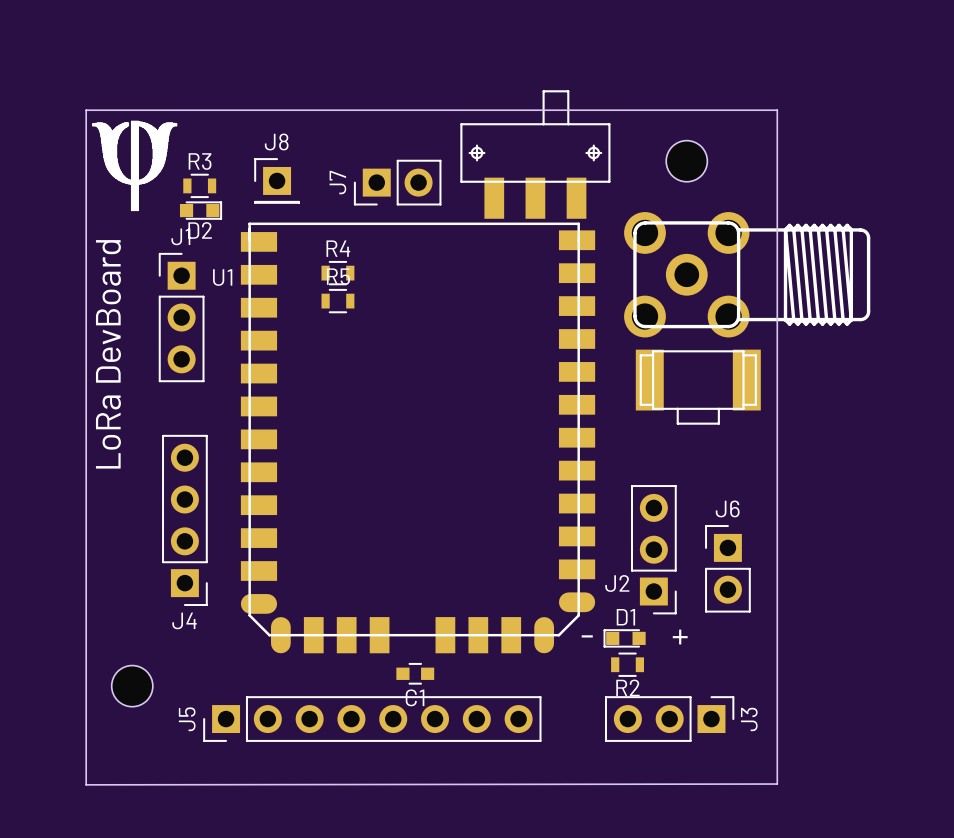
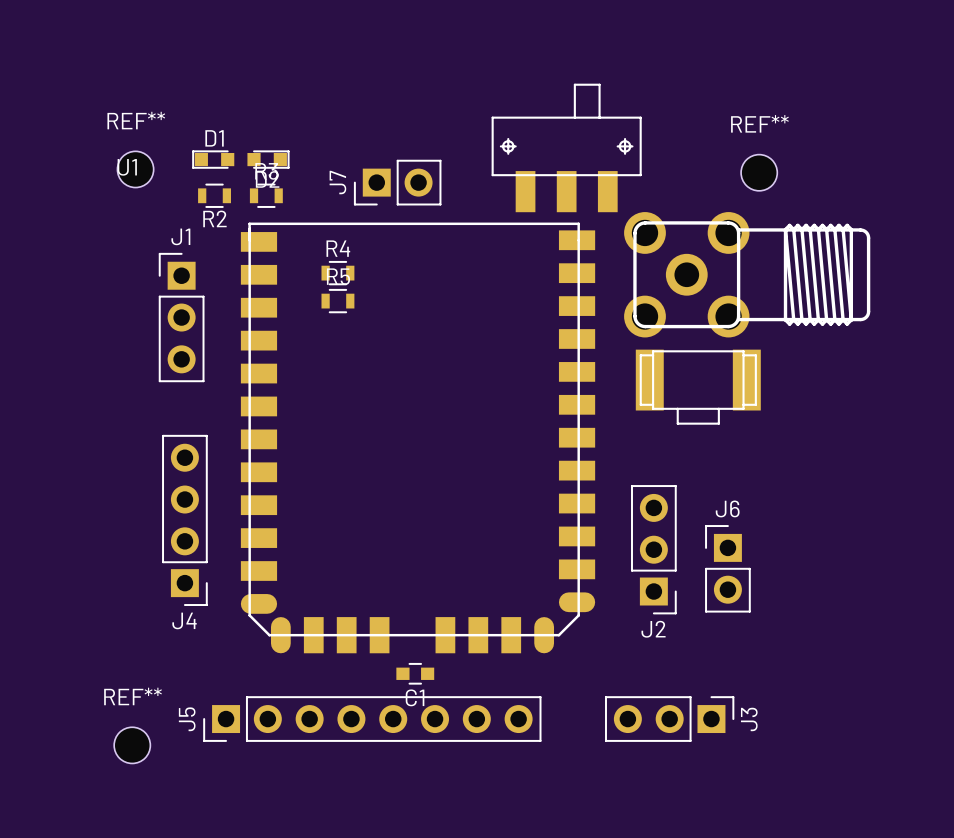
board edge: (86, 110) (86, 784) (777, 784) (777, 110) (86, 110) -> none
drawing: [92, 120, 178, 212] -> none
part position: (535, 154) -> (566, 147)
part: (686, 161) -> none
REF**: none -> (135, 169)
REF**: none -> (759, 172)
J8: (277, 180) -> none
R3 position: (199, 185) -> (266, 195)
D2 position: (201, 210) -> (268, 159)
U1 name position: U1 (222, 277) -> U1 (127, 167)
text: LoRa DevBoard (108, 354) -> none
J2 name position: J2 (617, 583) -> J2 (653, 629)
text: - (587, 636) -> none
text: + (680, 637) -> none
D1 position: (624, 638) -> (213, 159)
R2 position: (627, 664) -> (214, 195)
part: (132, 686) -> none
REF**: none -> (132, 745)

